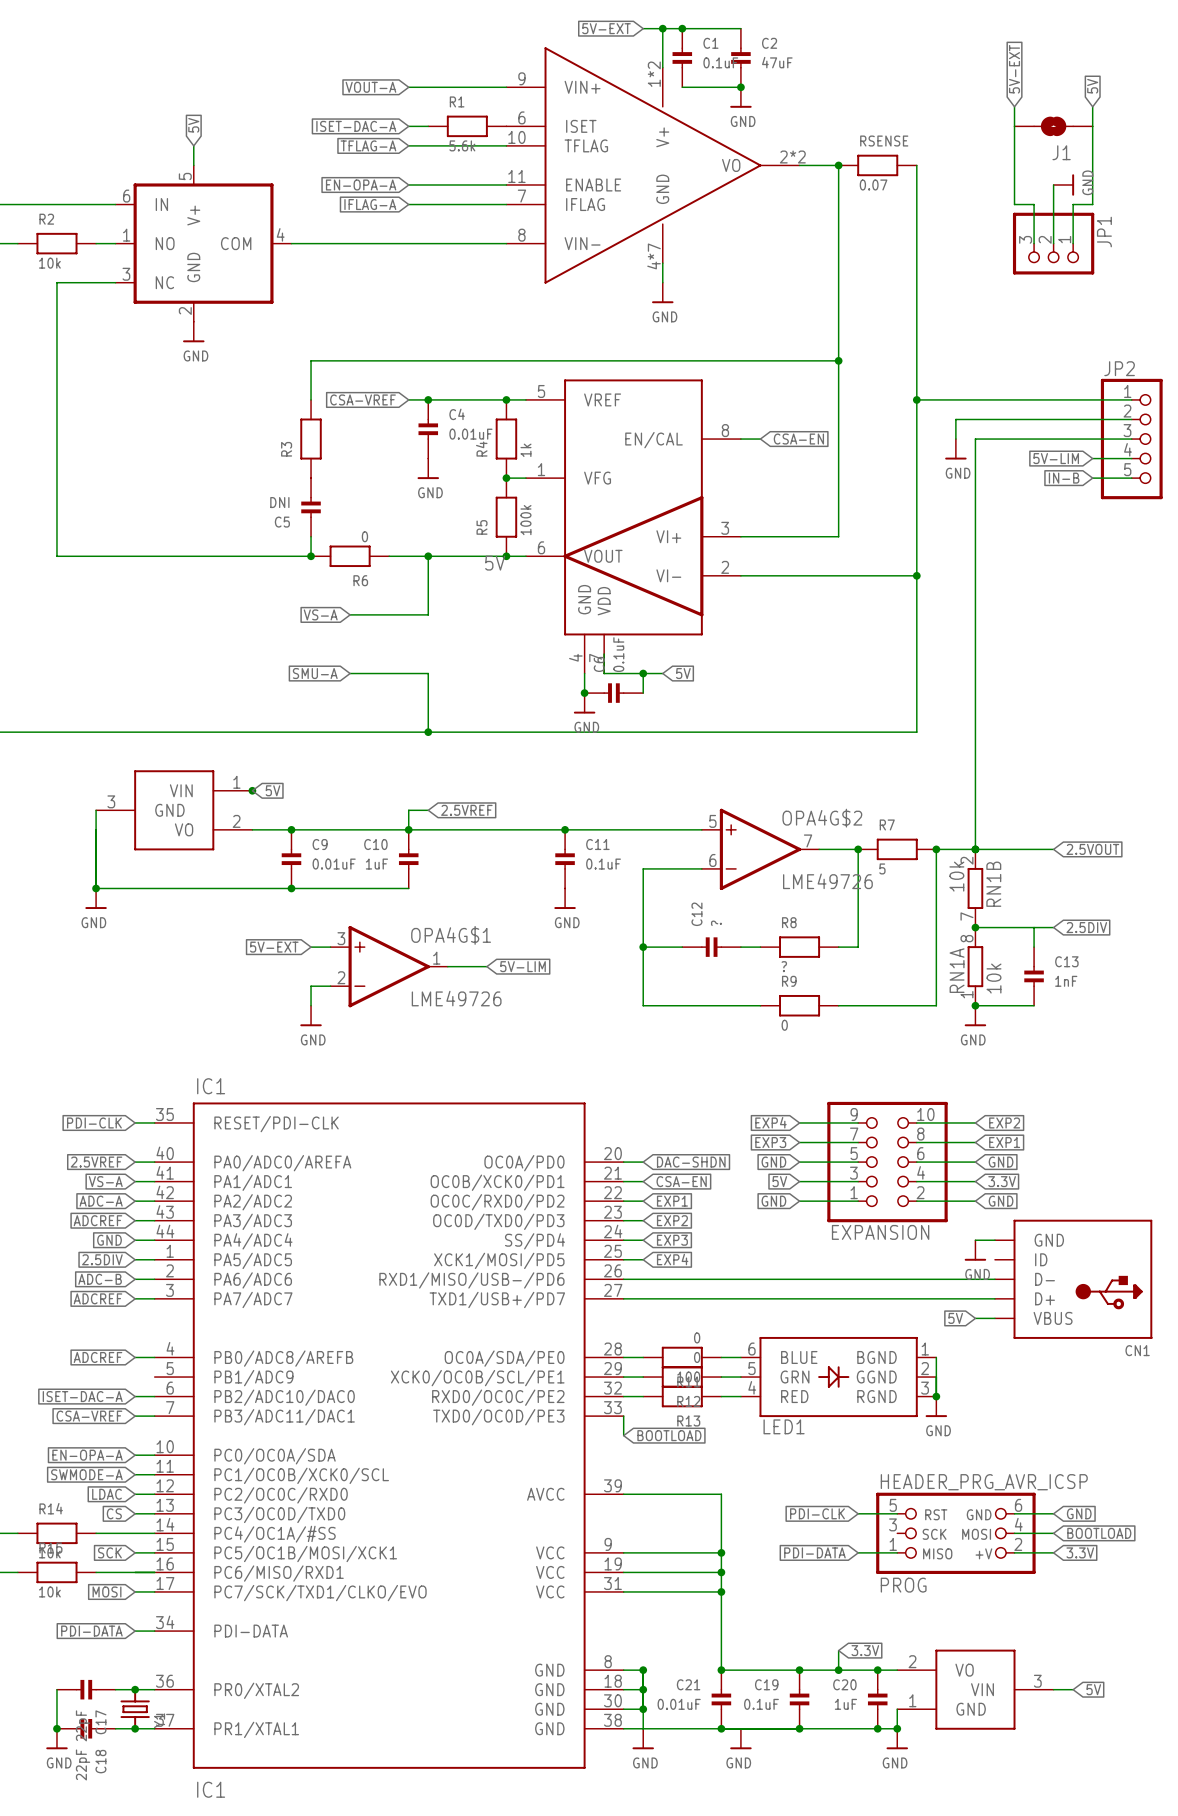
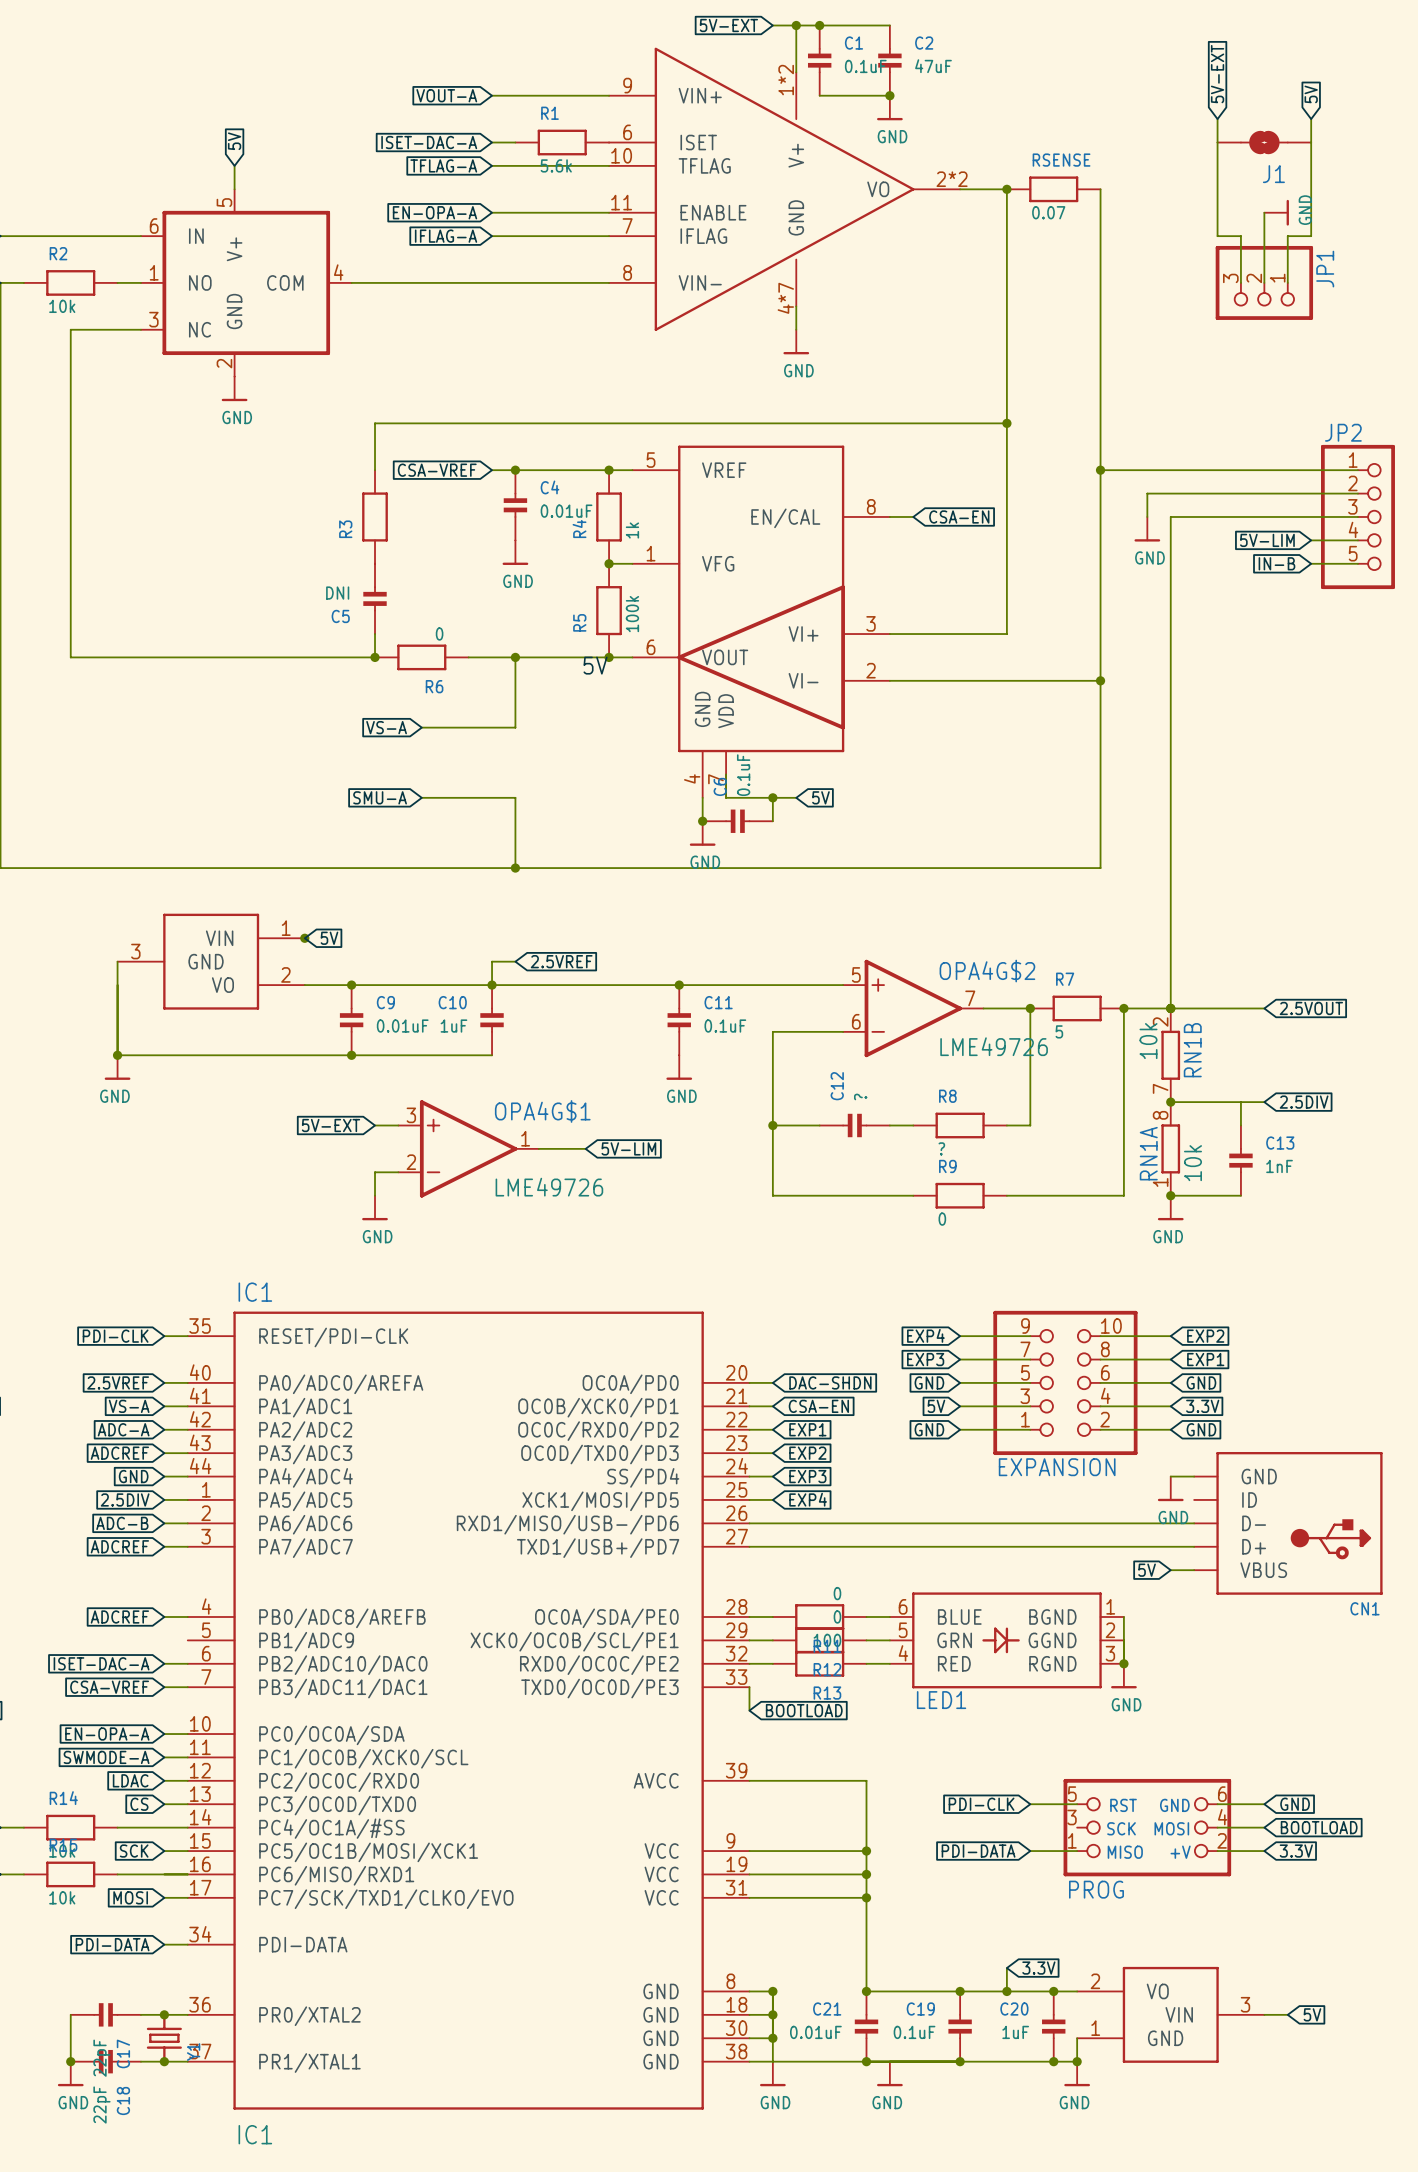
PROG value: HEADER_PRG_AVR_ICSP (984, 1482) -> none
PROG symbol: [876, 1492, 1036, 1575] -> [1063, 1778, 1232, 1877]

